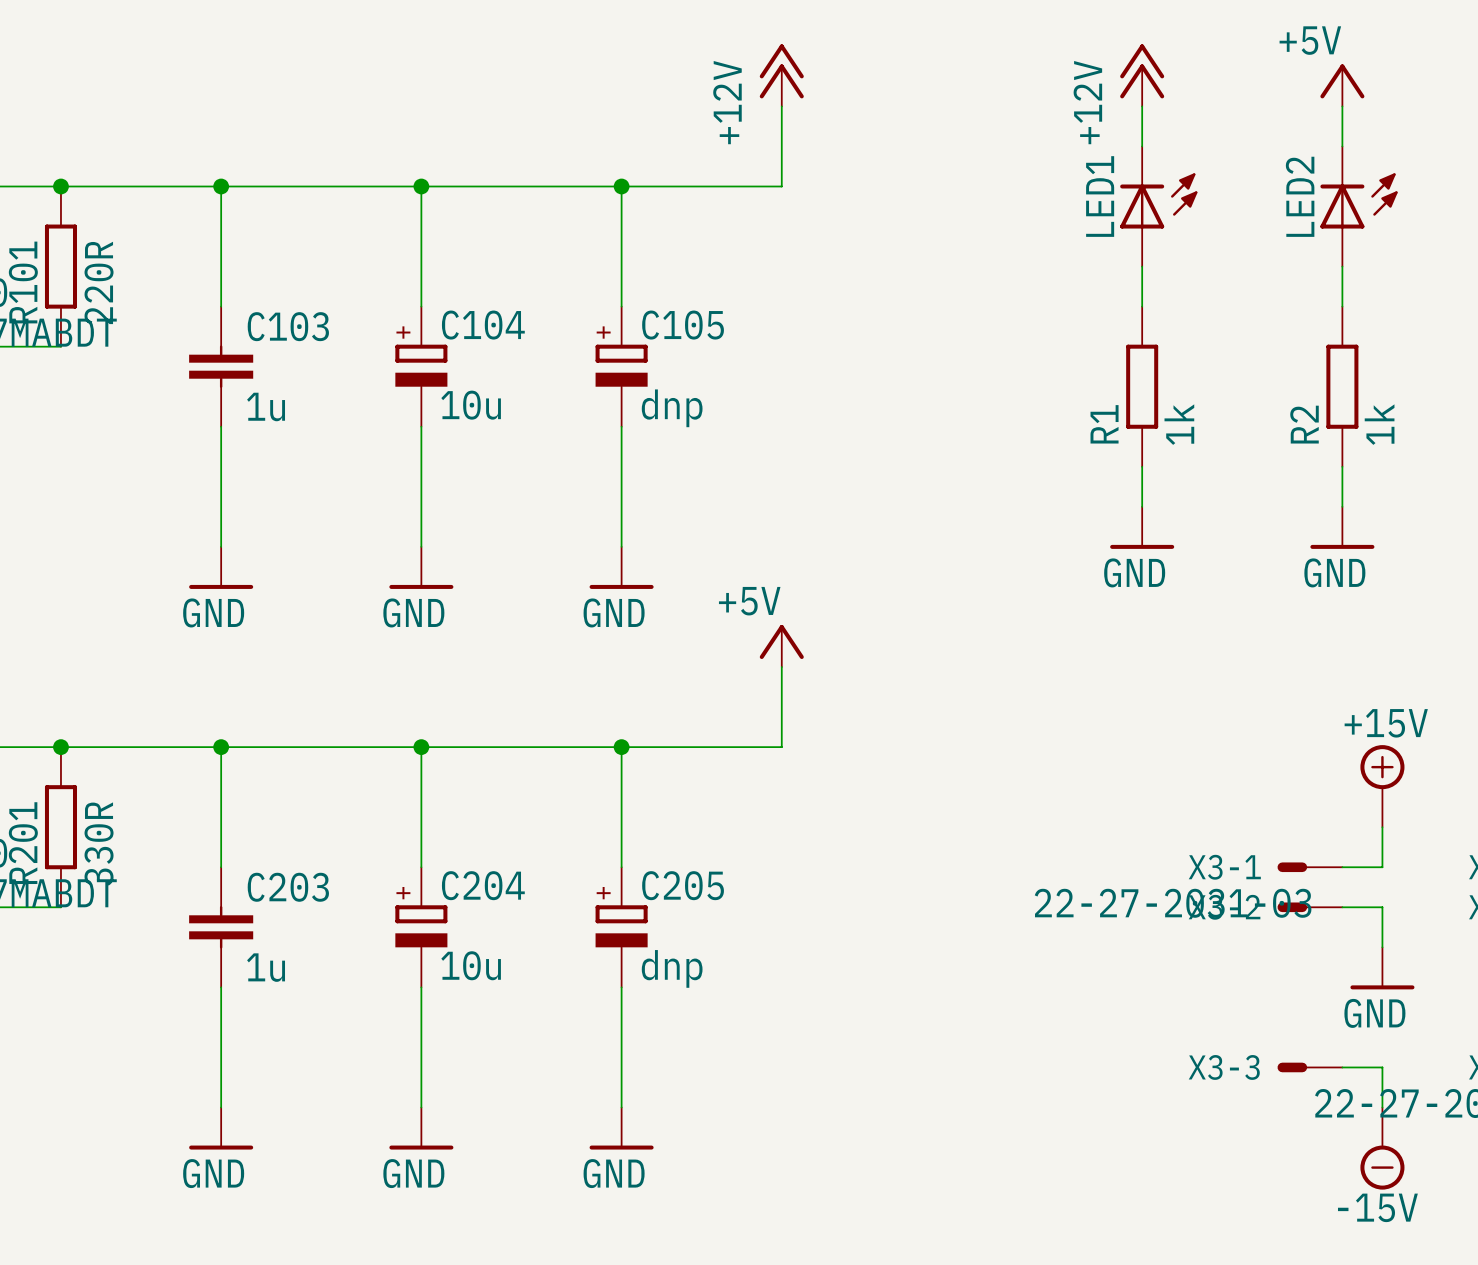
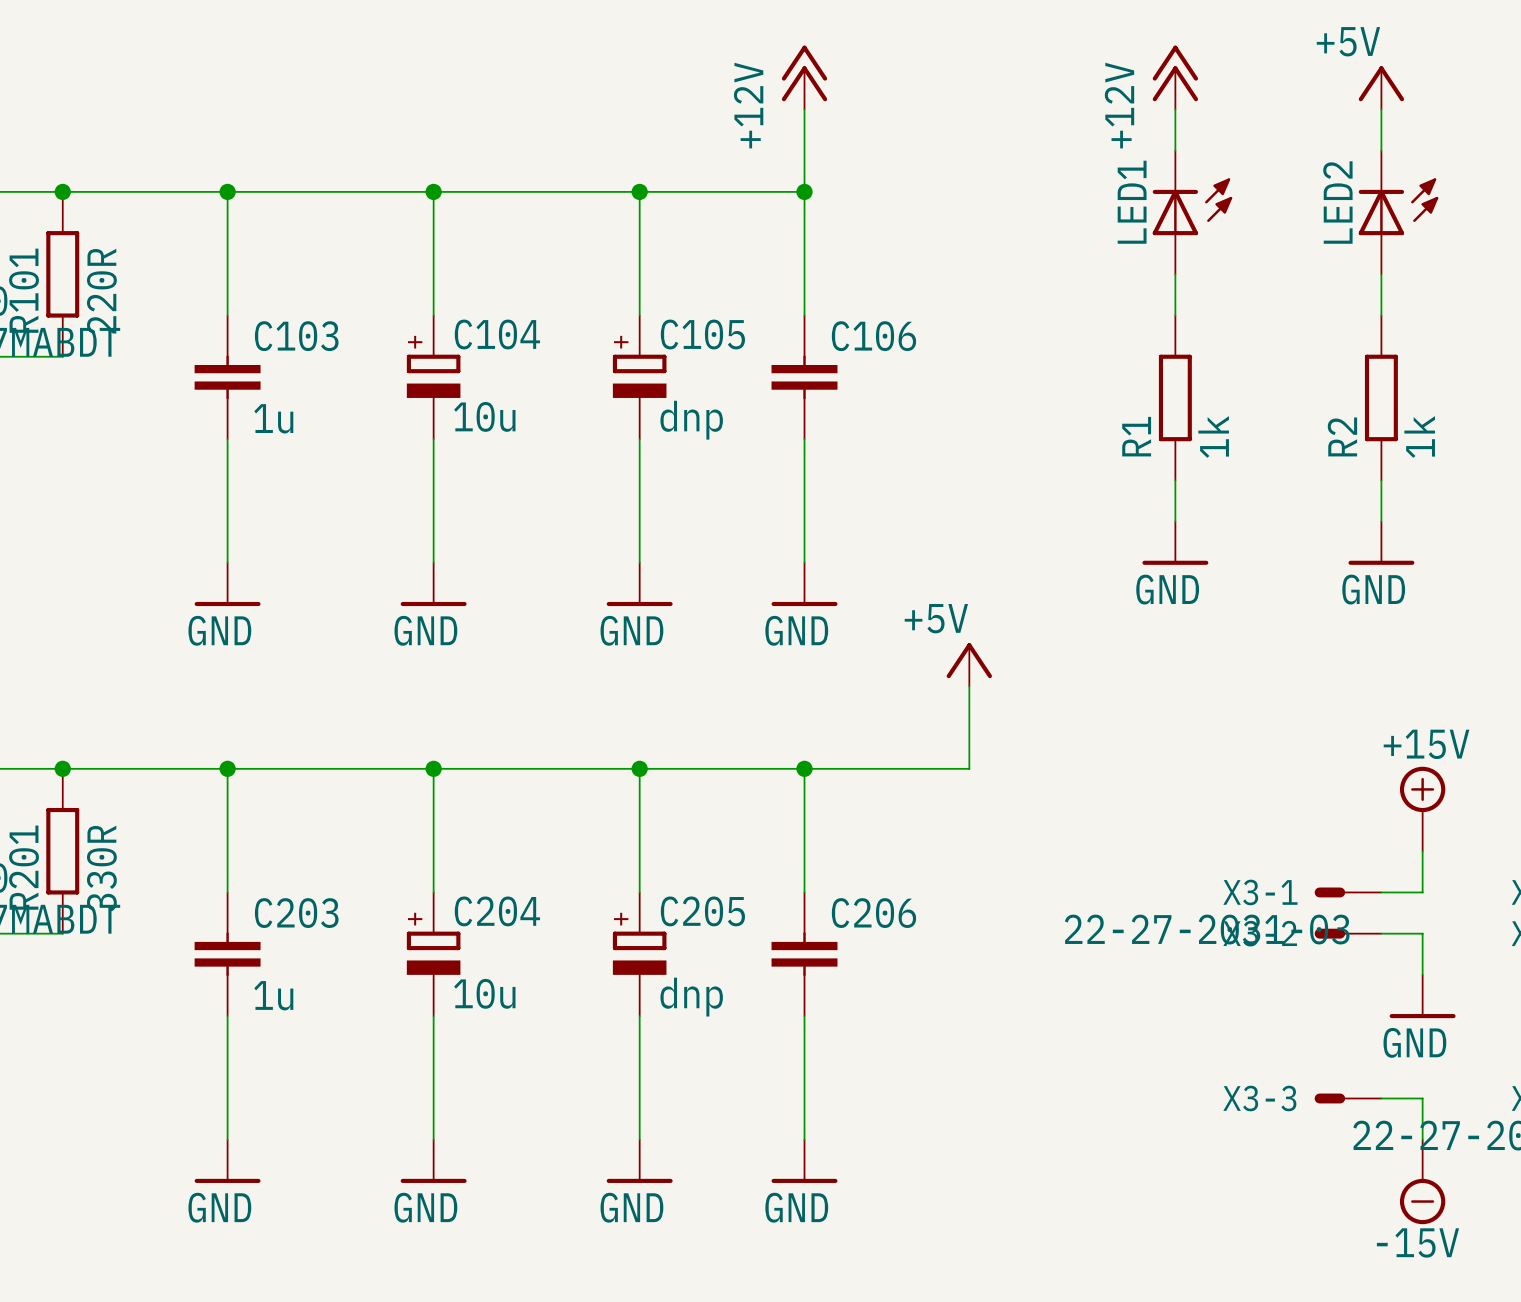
wire: none -> (804, 191) (804, 315)
junction: none -> (804, 191)
C106: none -> (804, 377)
wire: none -> (804, 439) (804, 562)
power symbol: none -> GND (804, 584)
power symbol position: +5V (781, 646) -> +5V (969, 664)
wire: (781, 667) (781, 747) -> none
wire: none -> (969, 686) (969, 768) (804, 768) (804, 892)
junction: none -> (804, 768)
C206: none -> (804, 954)
wire: none -> (804, 1016) (804, 1139)
power symbol: none -> GND (804, 1161)

